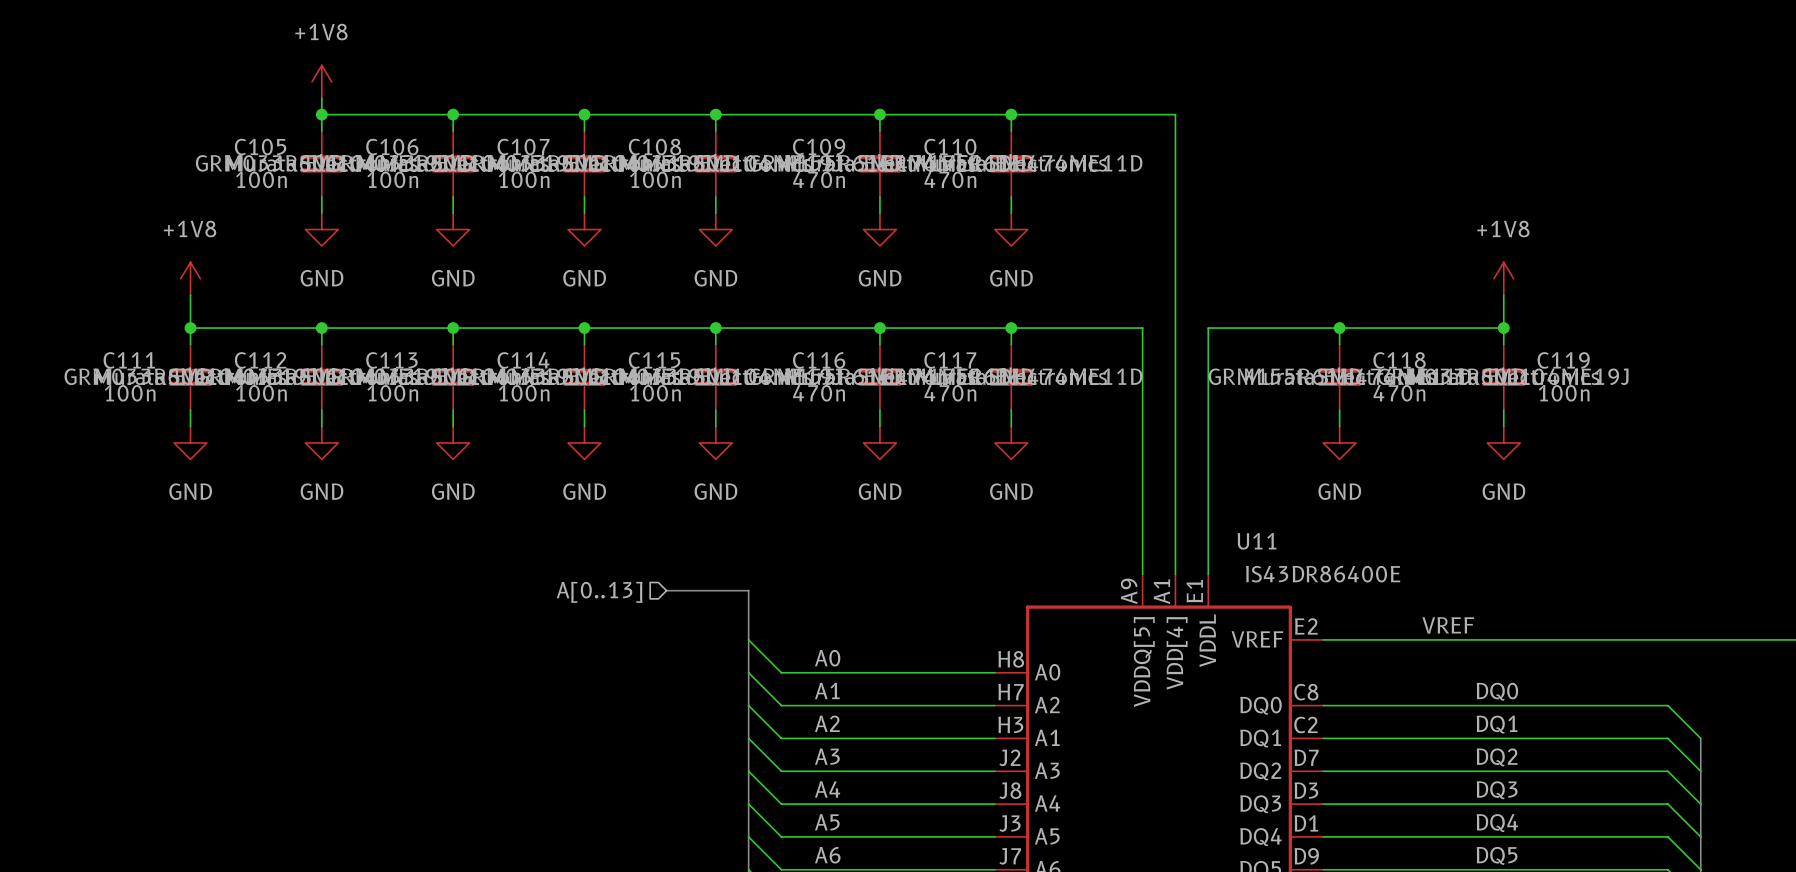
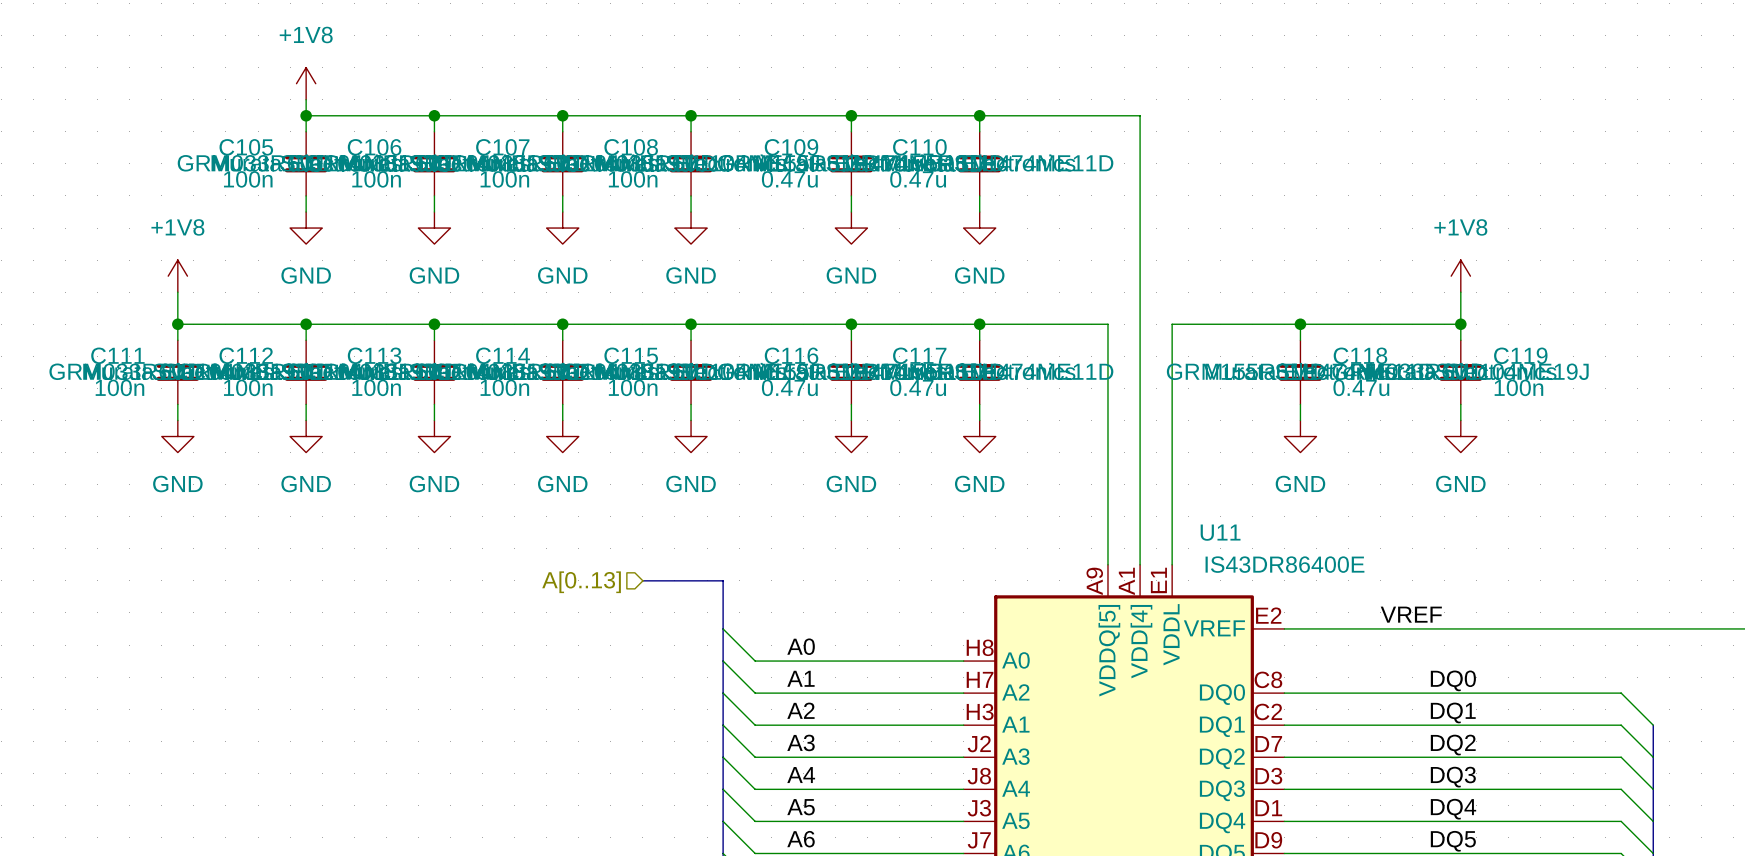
C109 value: 470n (819, 179) -> 0.47u (789, 179)
C110 value: 470n (950, 179) -> 0.47u (918, 179)
C116 value: 470n (819, 393) -> 0.47u (789, 387)
C117 value: 470n (950, 393) -> 0.47u (918, 387)
C118 value: 470n (1399, 393) -> 0.47u (1361, 387)

